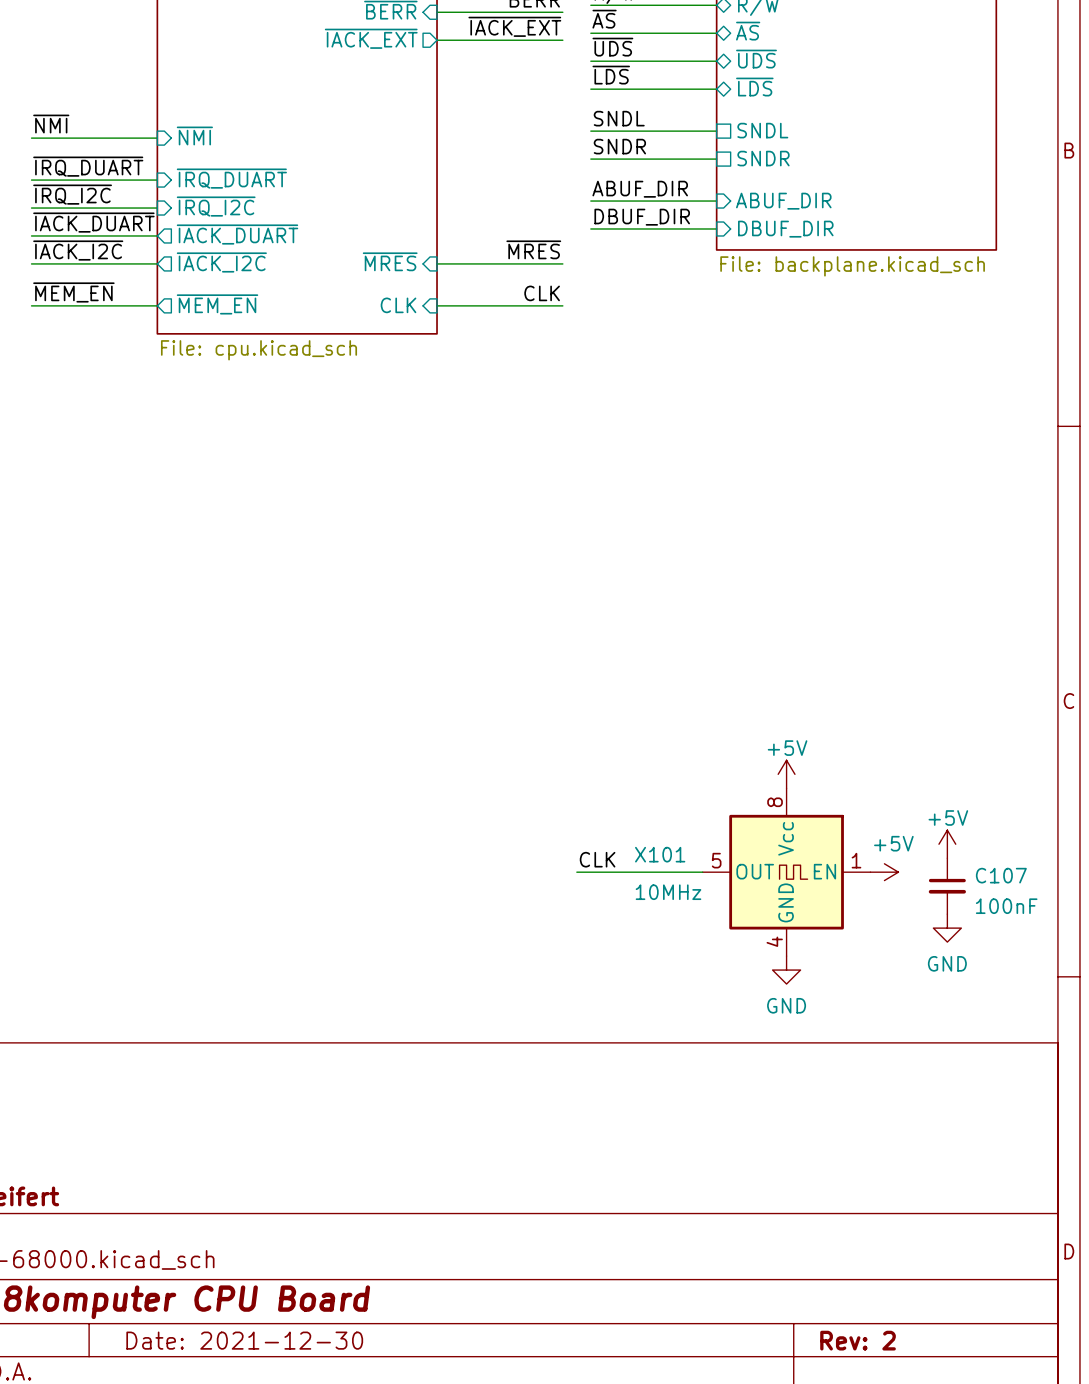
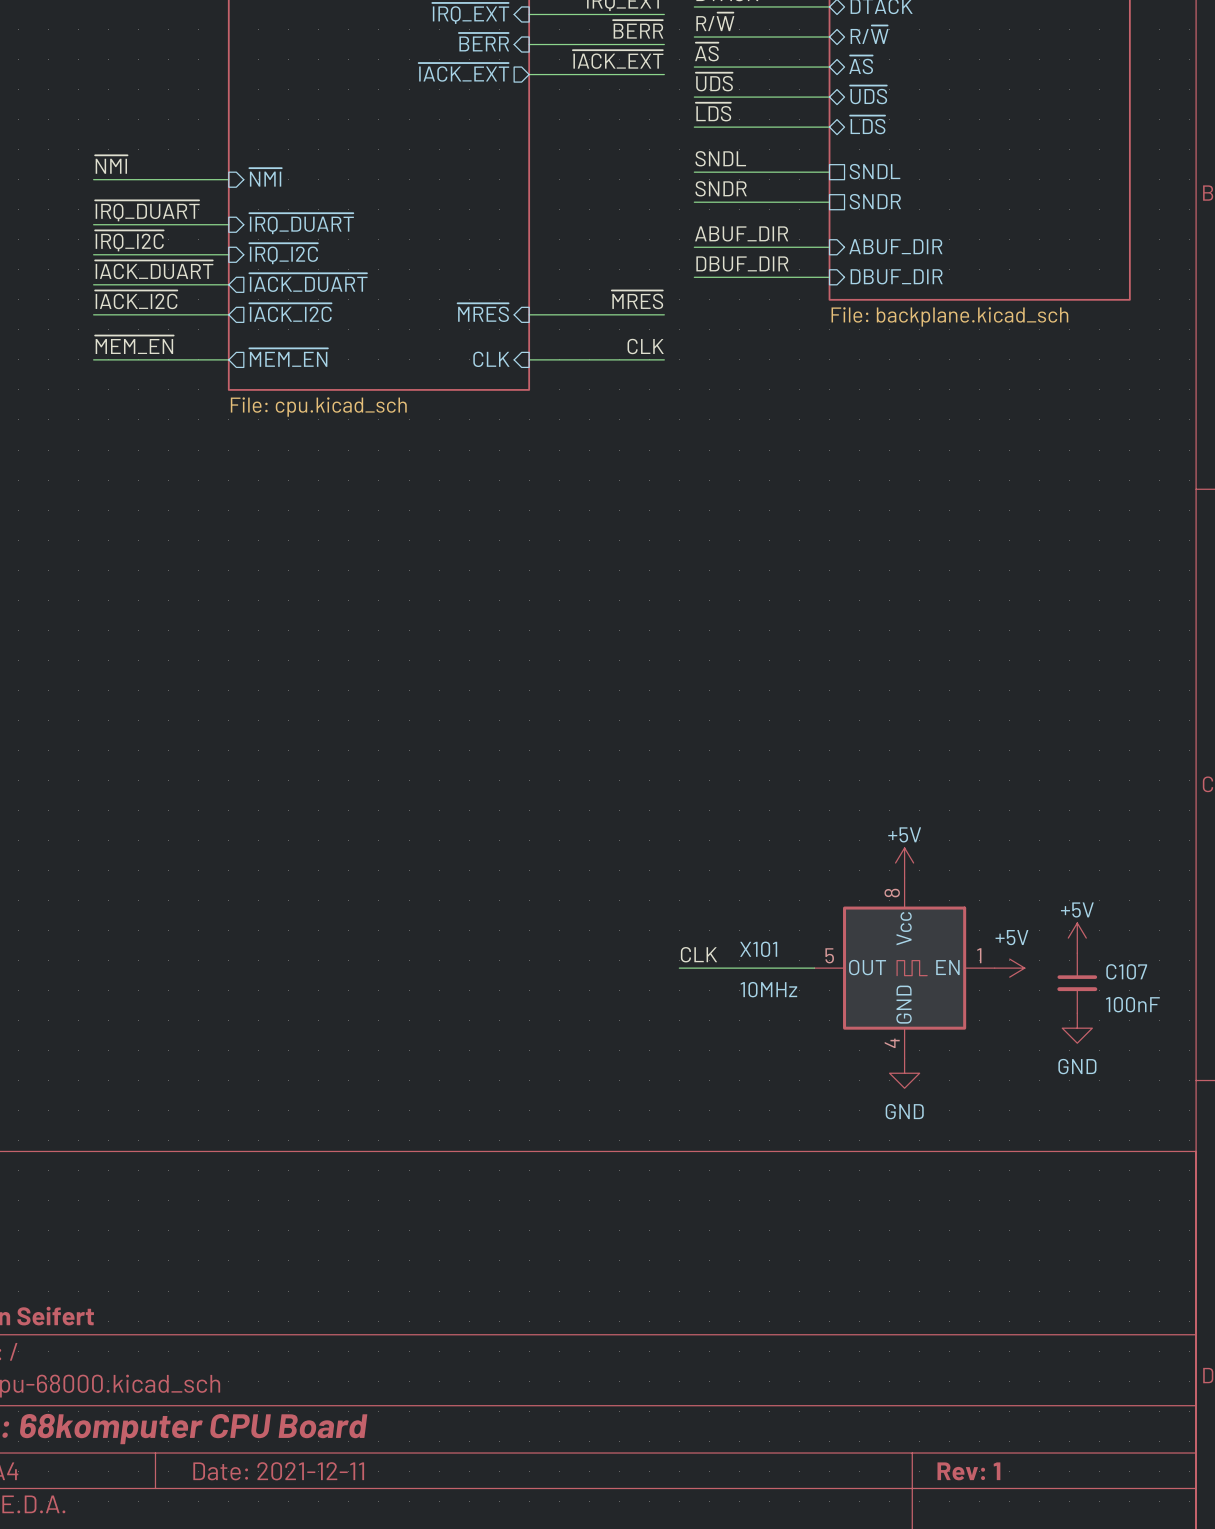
title block: Date: 2021-12-30 (244, 1340) -> Date: 2021-12-11 (278, 1471)
title block: Rev: 2 (858, 1340) -> Rev: 1 (968, 1471)

